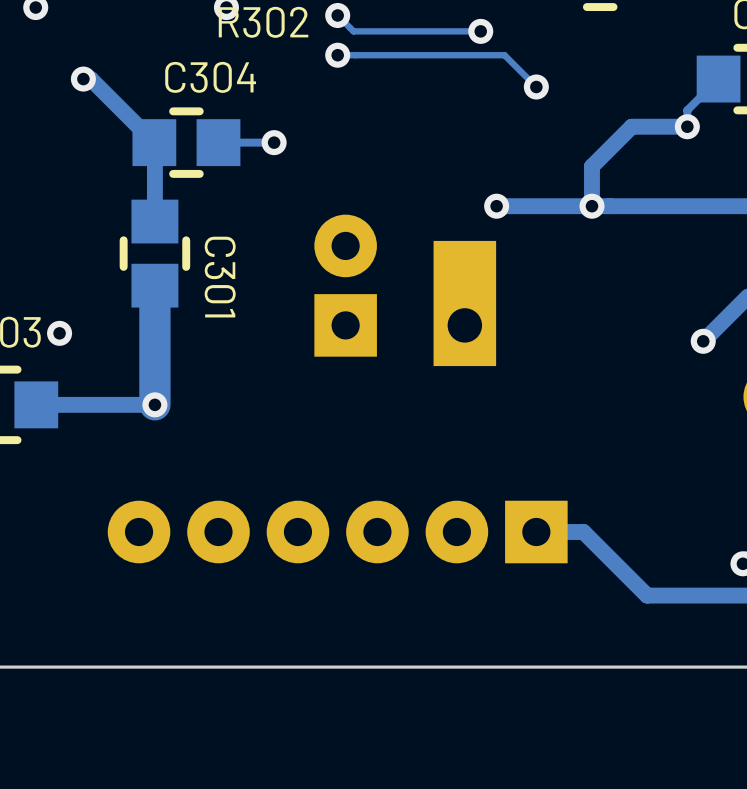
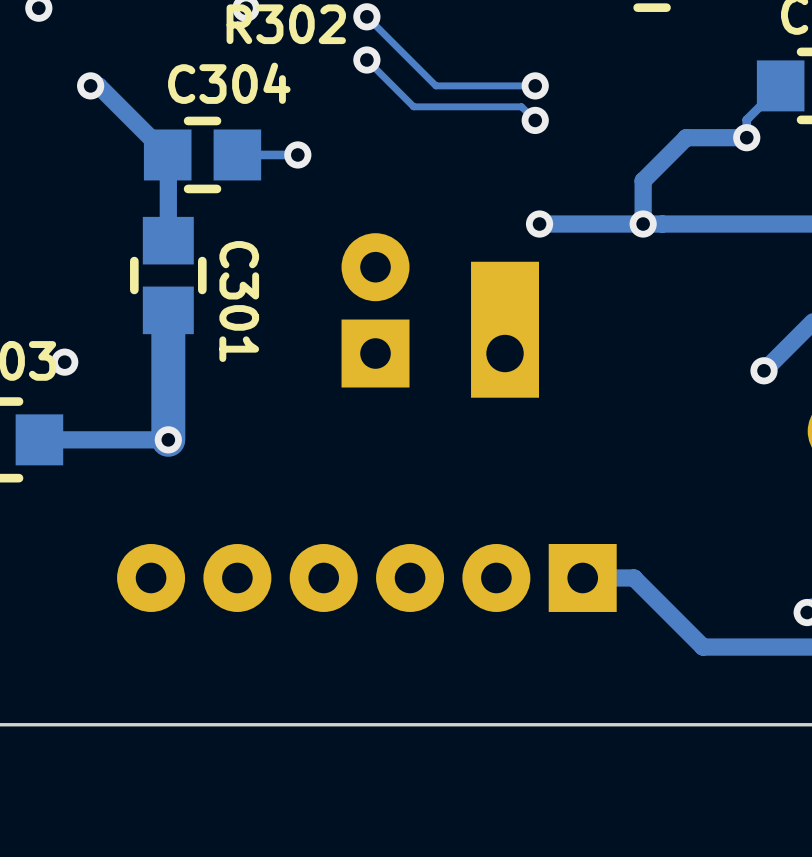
track: (480, 31) (353, 31) -> (535, 85) (435, 85) (384, 34)
via: (480, 31) -> none
track: (337, 55) (504, 55) (536, 87) -> (366, 59) (413, 106) (521, 106) (535, 120)
via: none -> (535, 85)
via: (536, 87) -> none
via: none -> (535, 120)

